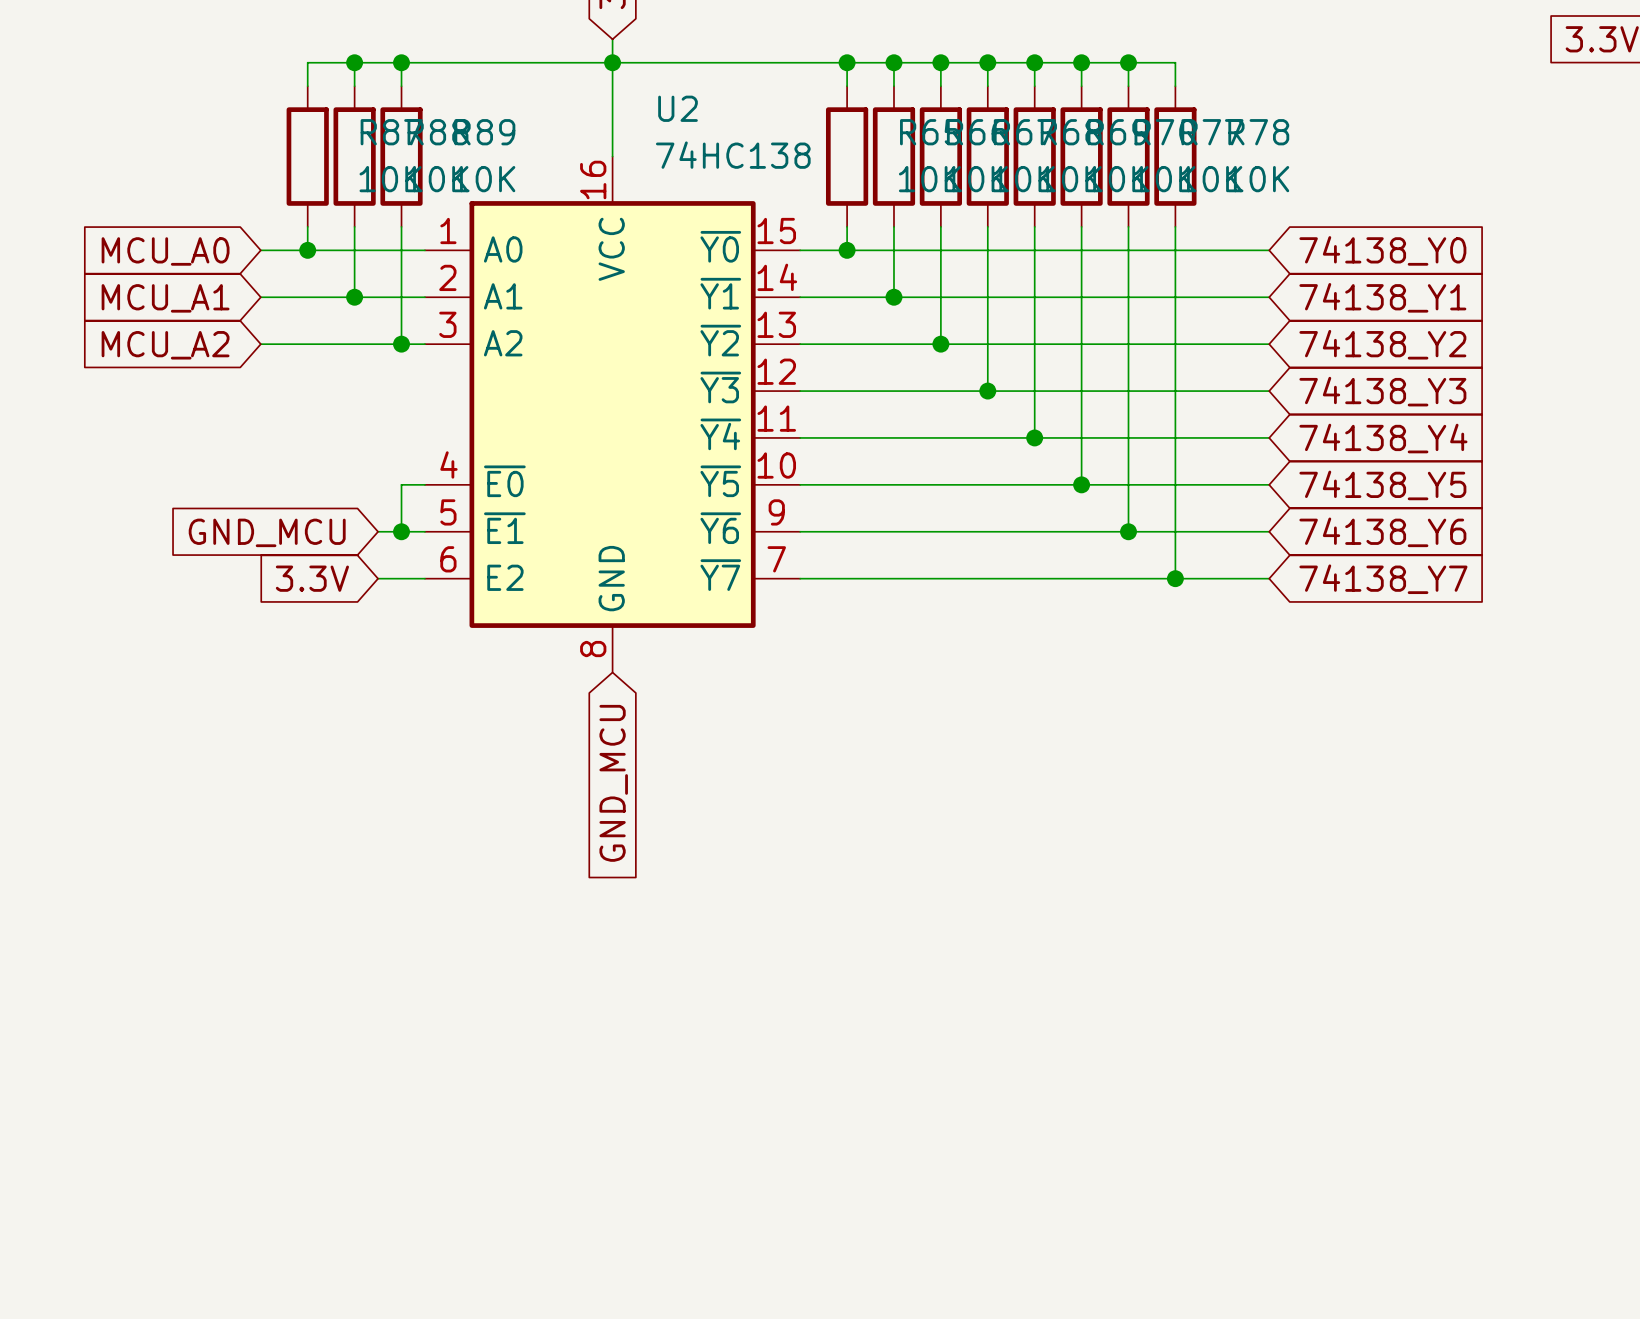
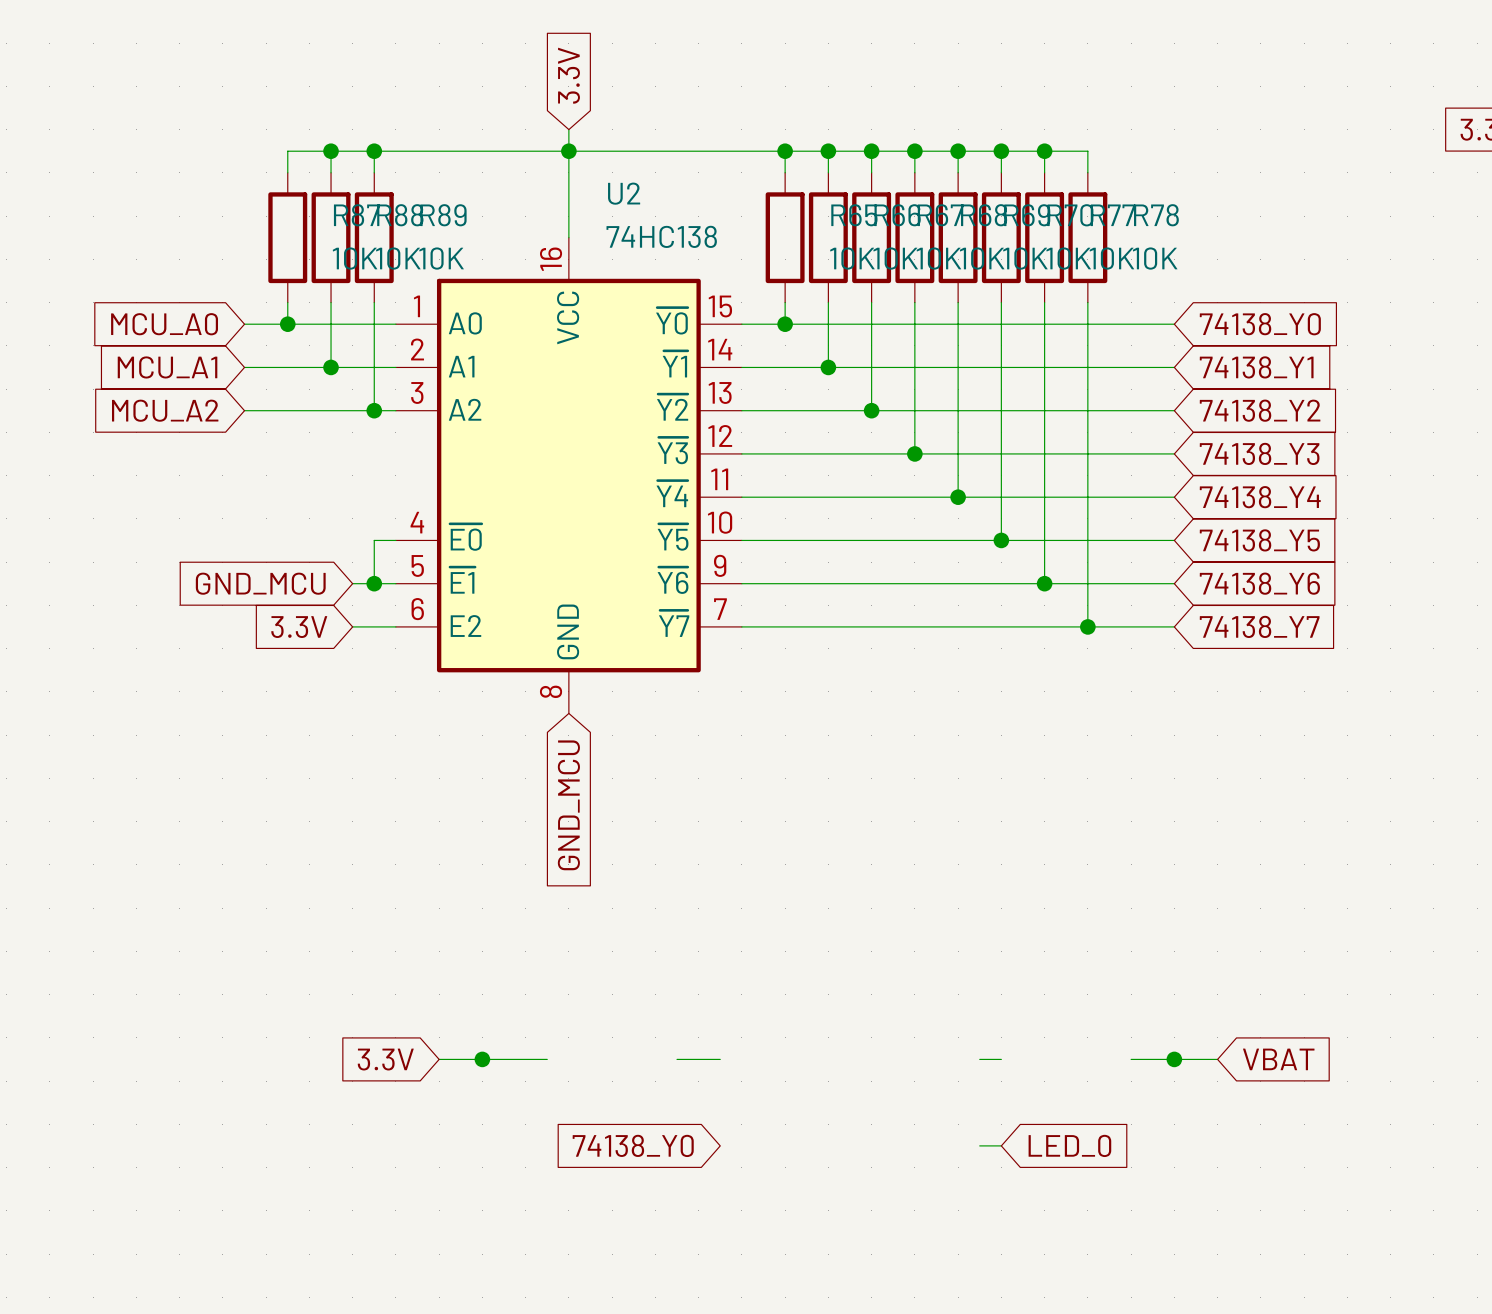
global label: none -> 3.3V (385, 1059)
wire: none -> (439, 1059) (547, 1059)
junction: none -> (482, 1059)
wire: none -> (677, 1059) (720, 1059)
wire: none -> (979, 1059) (1001, 1059)
wire: none -> (1131, 1059) (1217, 1059)
junction: none -> (1174, 1059)
global label: none -> VBAT (1278, 1059)
wire: none -> (979, 1145) (1001, 1145)
global label: none -> 74138_Y0 (633, 1145)
global label: none -> LED_0 (1069, 1145)

